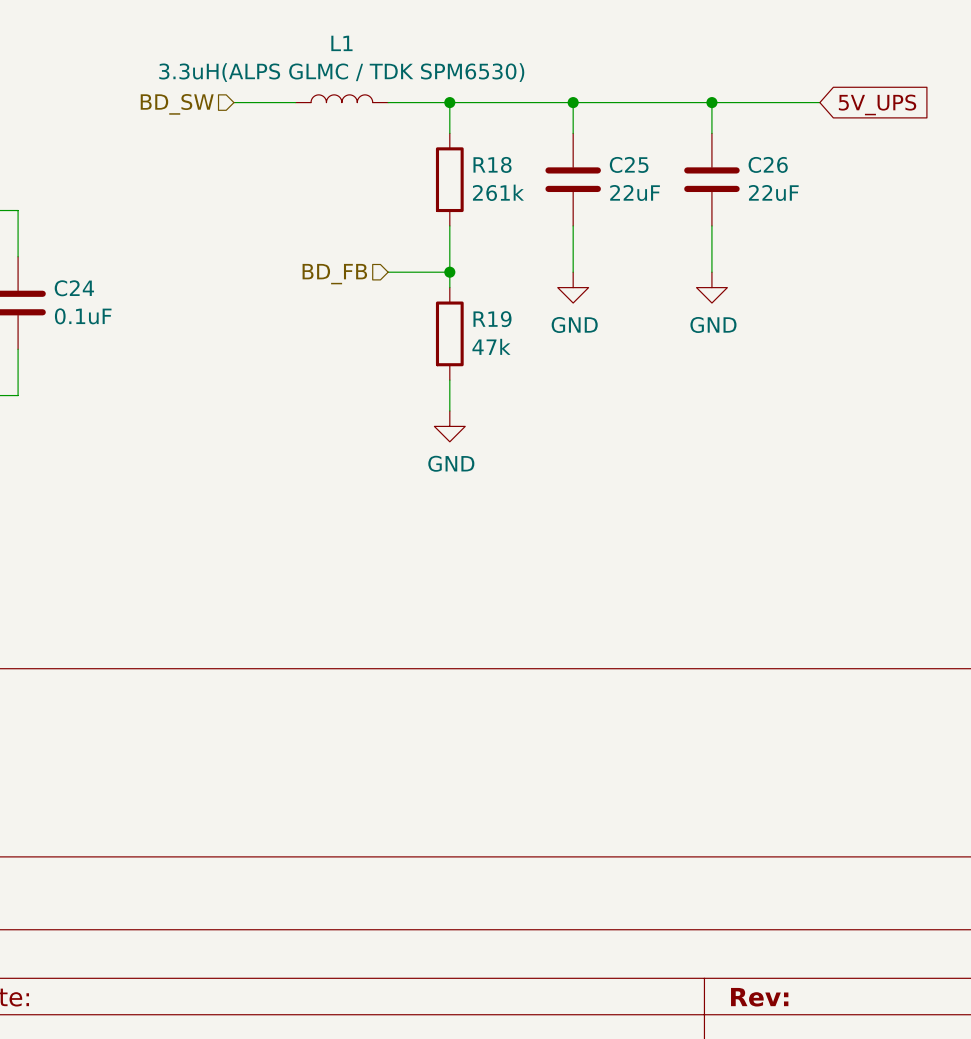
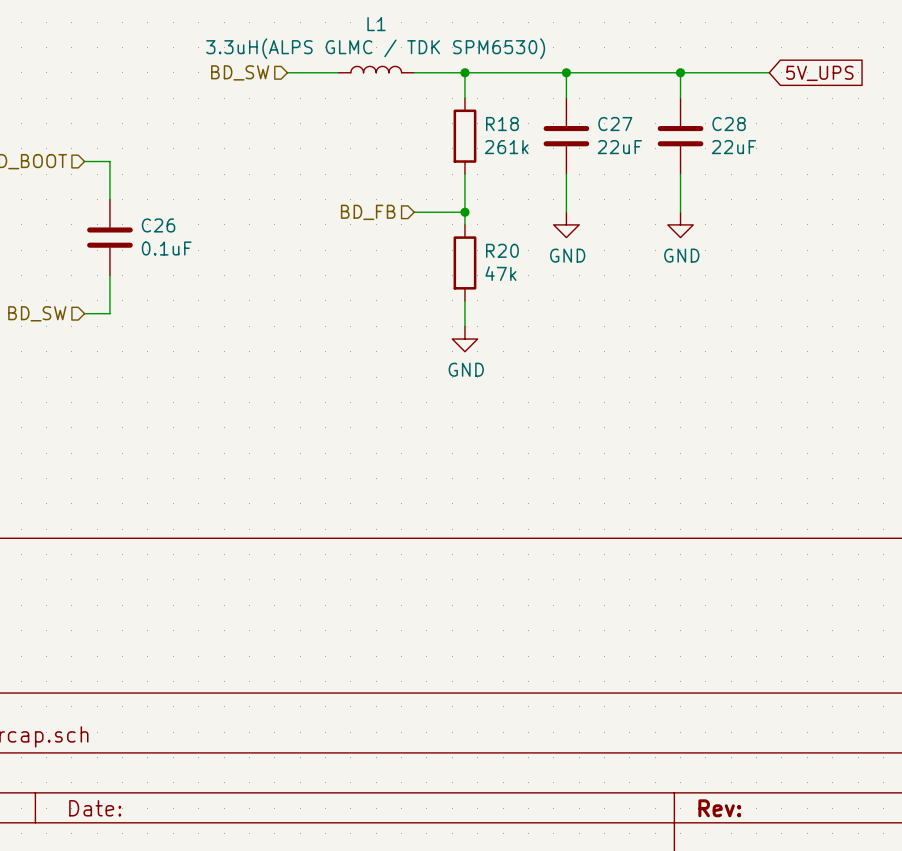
C25 name: C25 (629, 164) -> C27 (615, 124)
C26 name: C26 (768, 164) -> C28 (729, 124)
C24 name: C24 (74, 288) -> C26 (158, 225)
R19 name: R19 (492, 319) -> R20 (502, 250)

